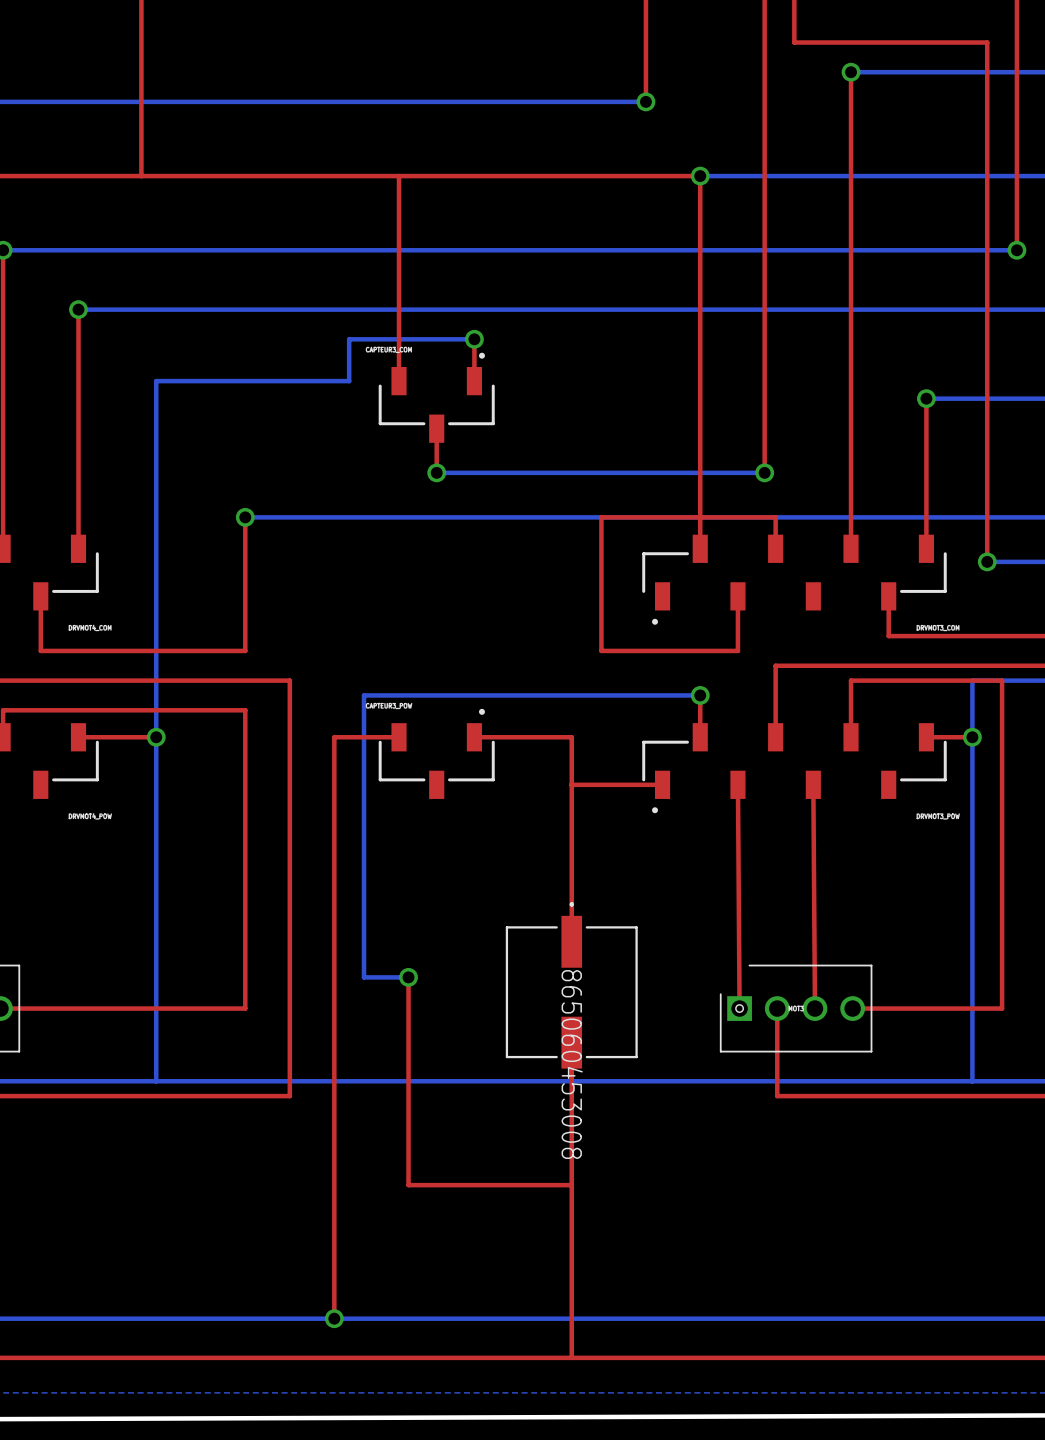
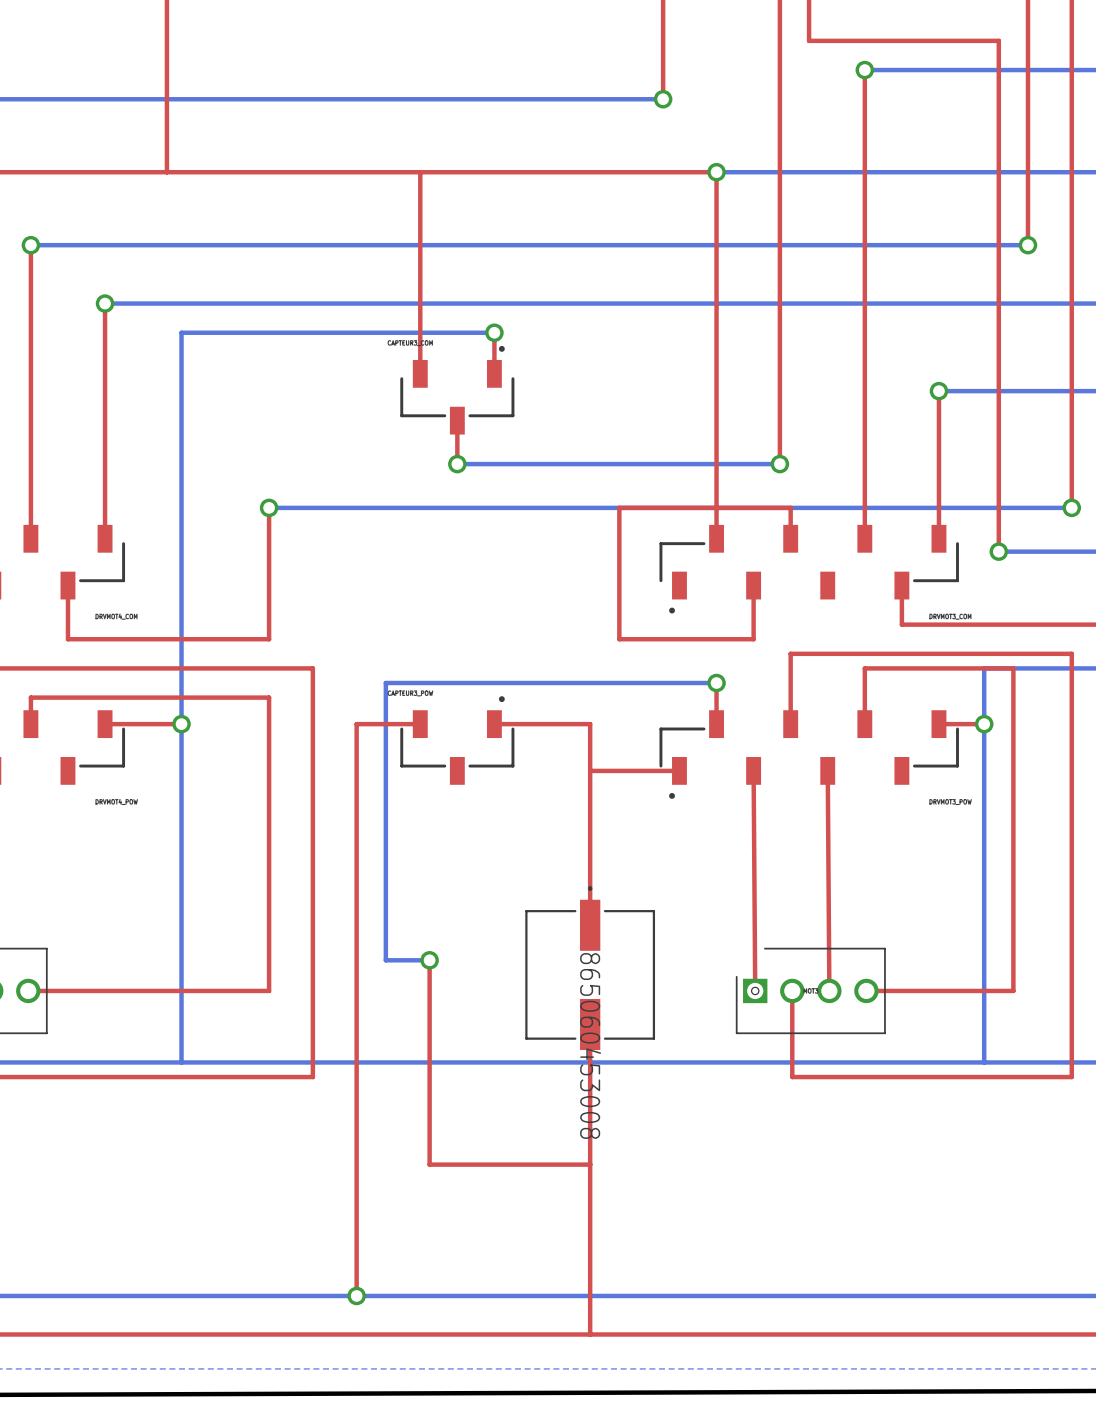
bottom track: (349, 339) (349, 381) (156, 381) -> (371, 332) (181, 332) (181, 373)

